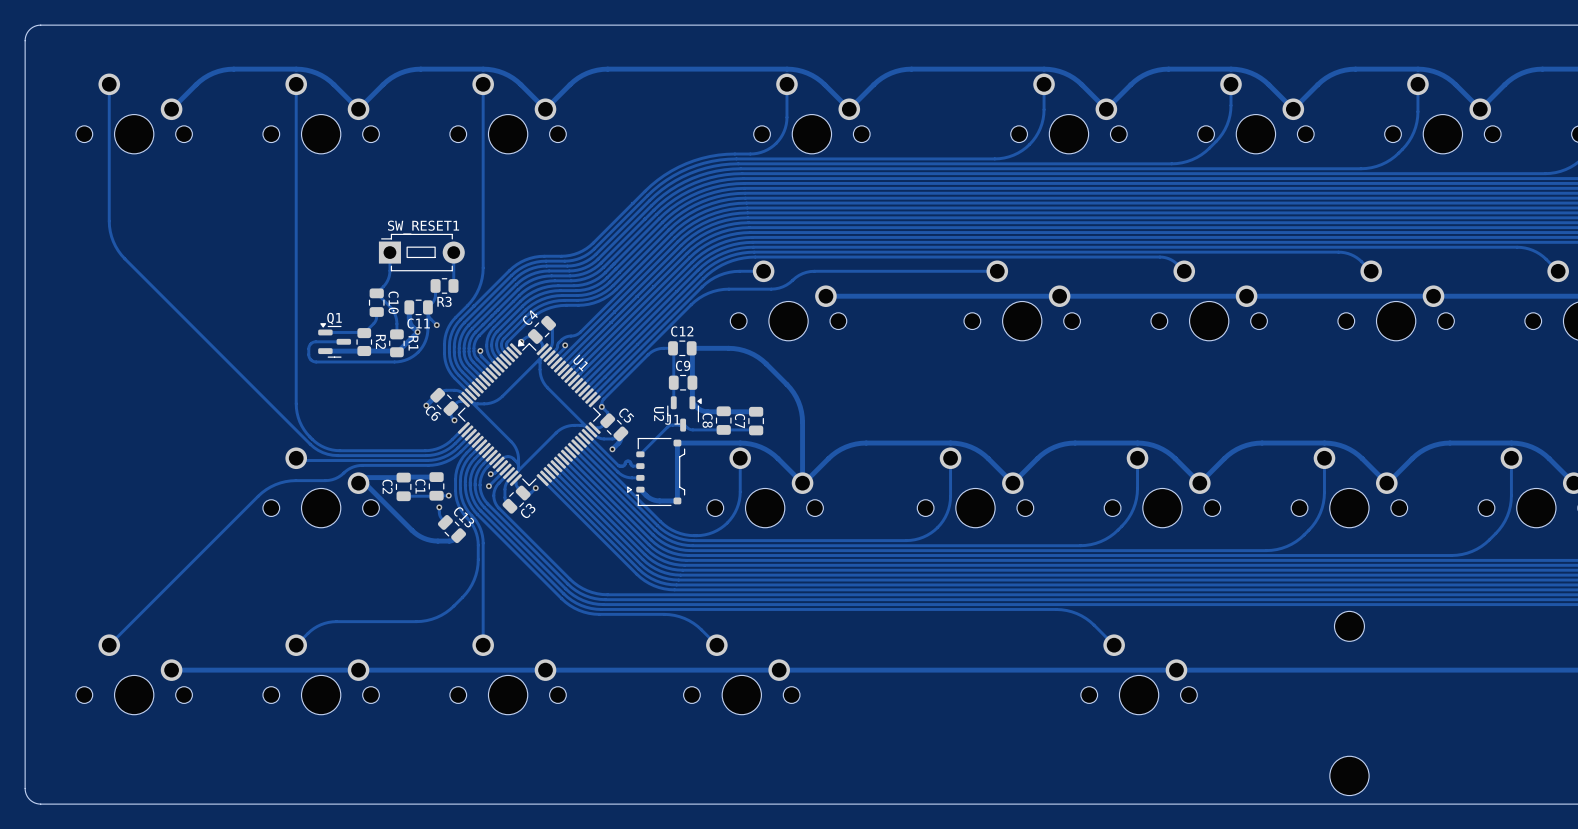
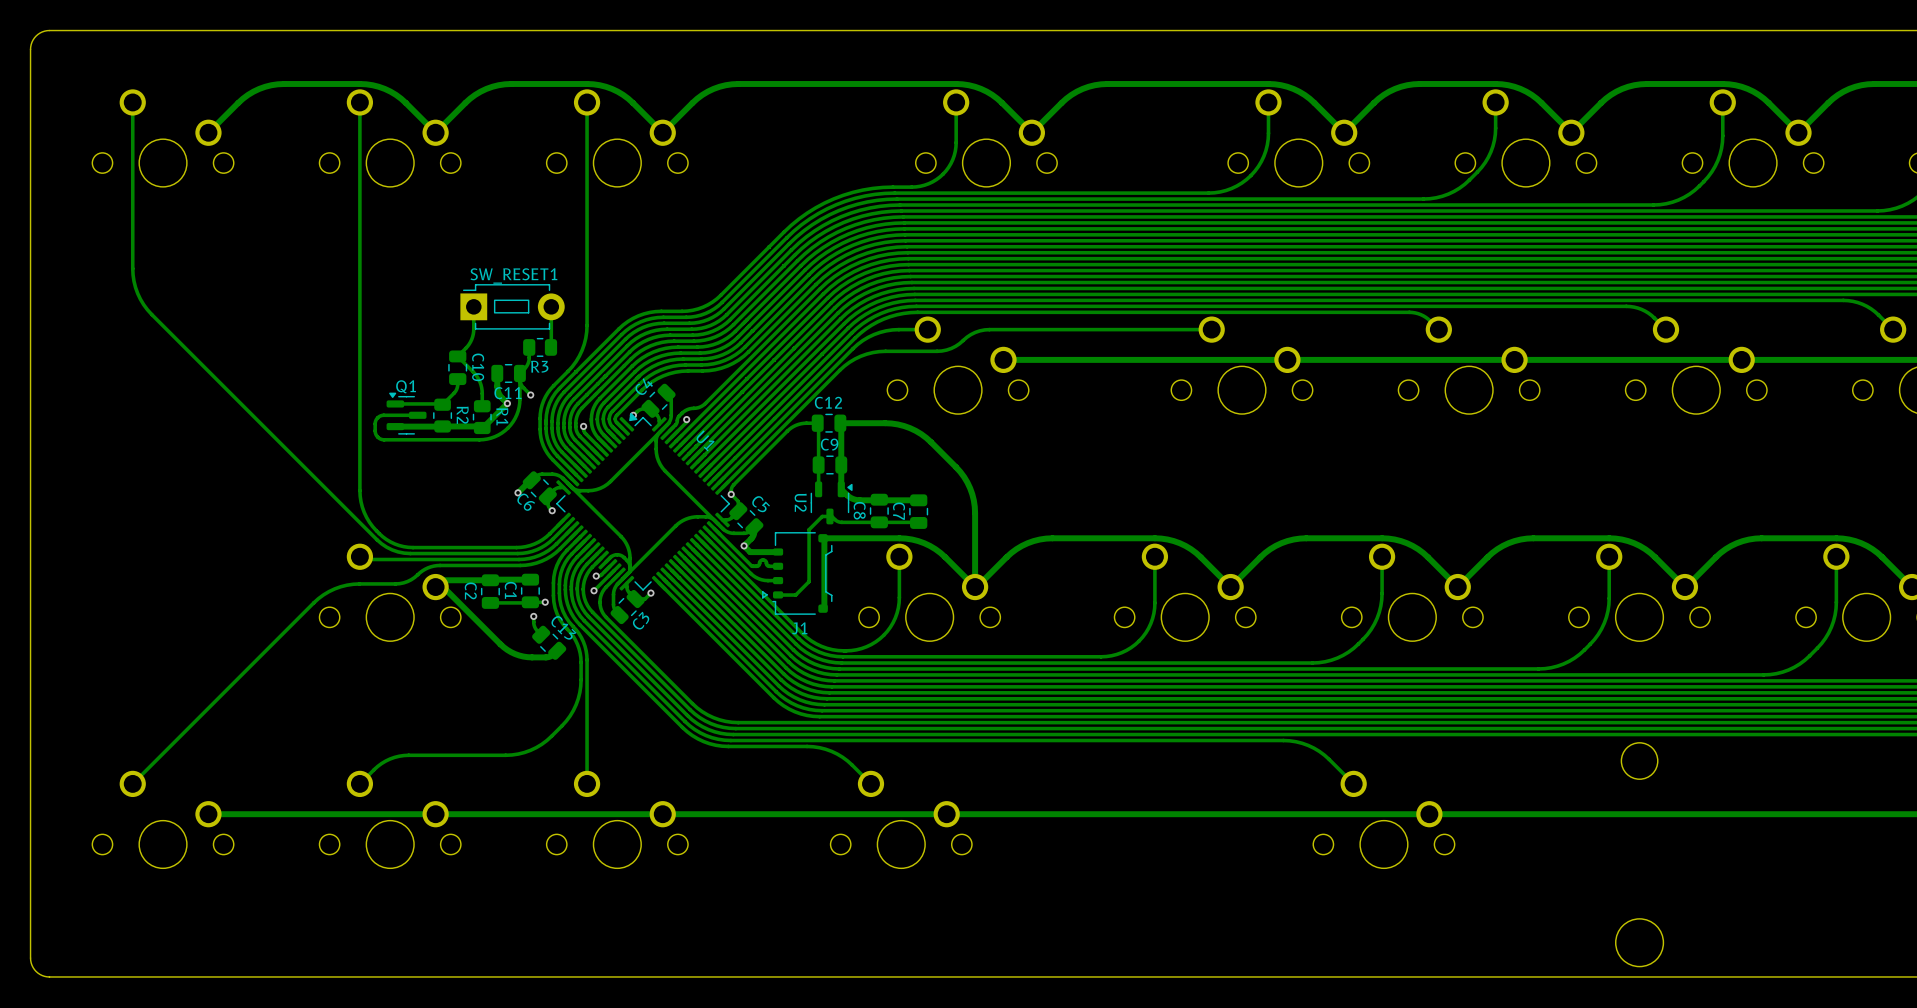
J1 name position: J1 (672, 419) -> J1 (799, 628)
track: (676, 425) (668, 426) (640, 454) -> (822, 516) (809, 529) (809, 581) (795, 595) (779, 595)
track: (678, 443) (677, 500) (654, 500) (640, 489) -> (824, 538) (824, 608)
track: none -> (744, 545) (750, 552) (779, 552)

